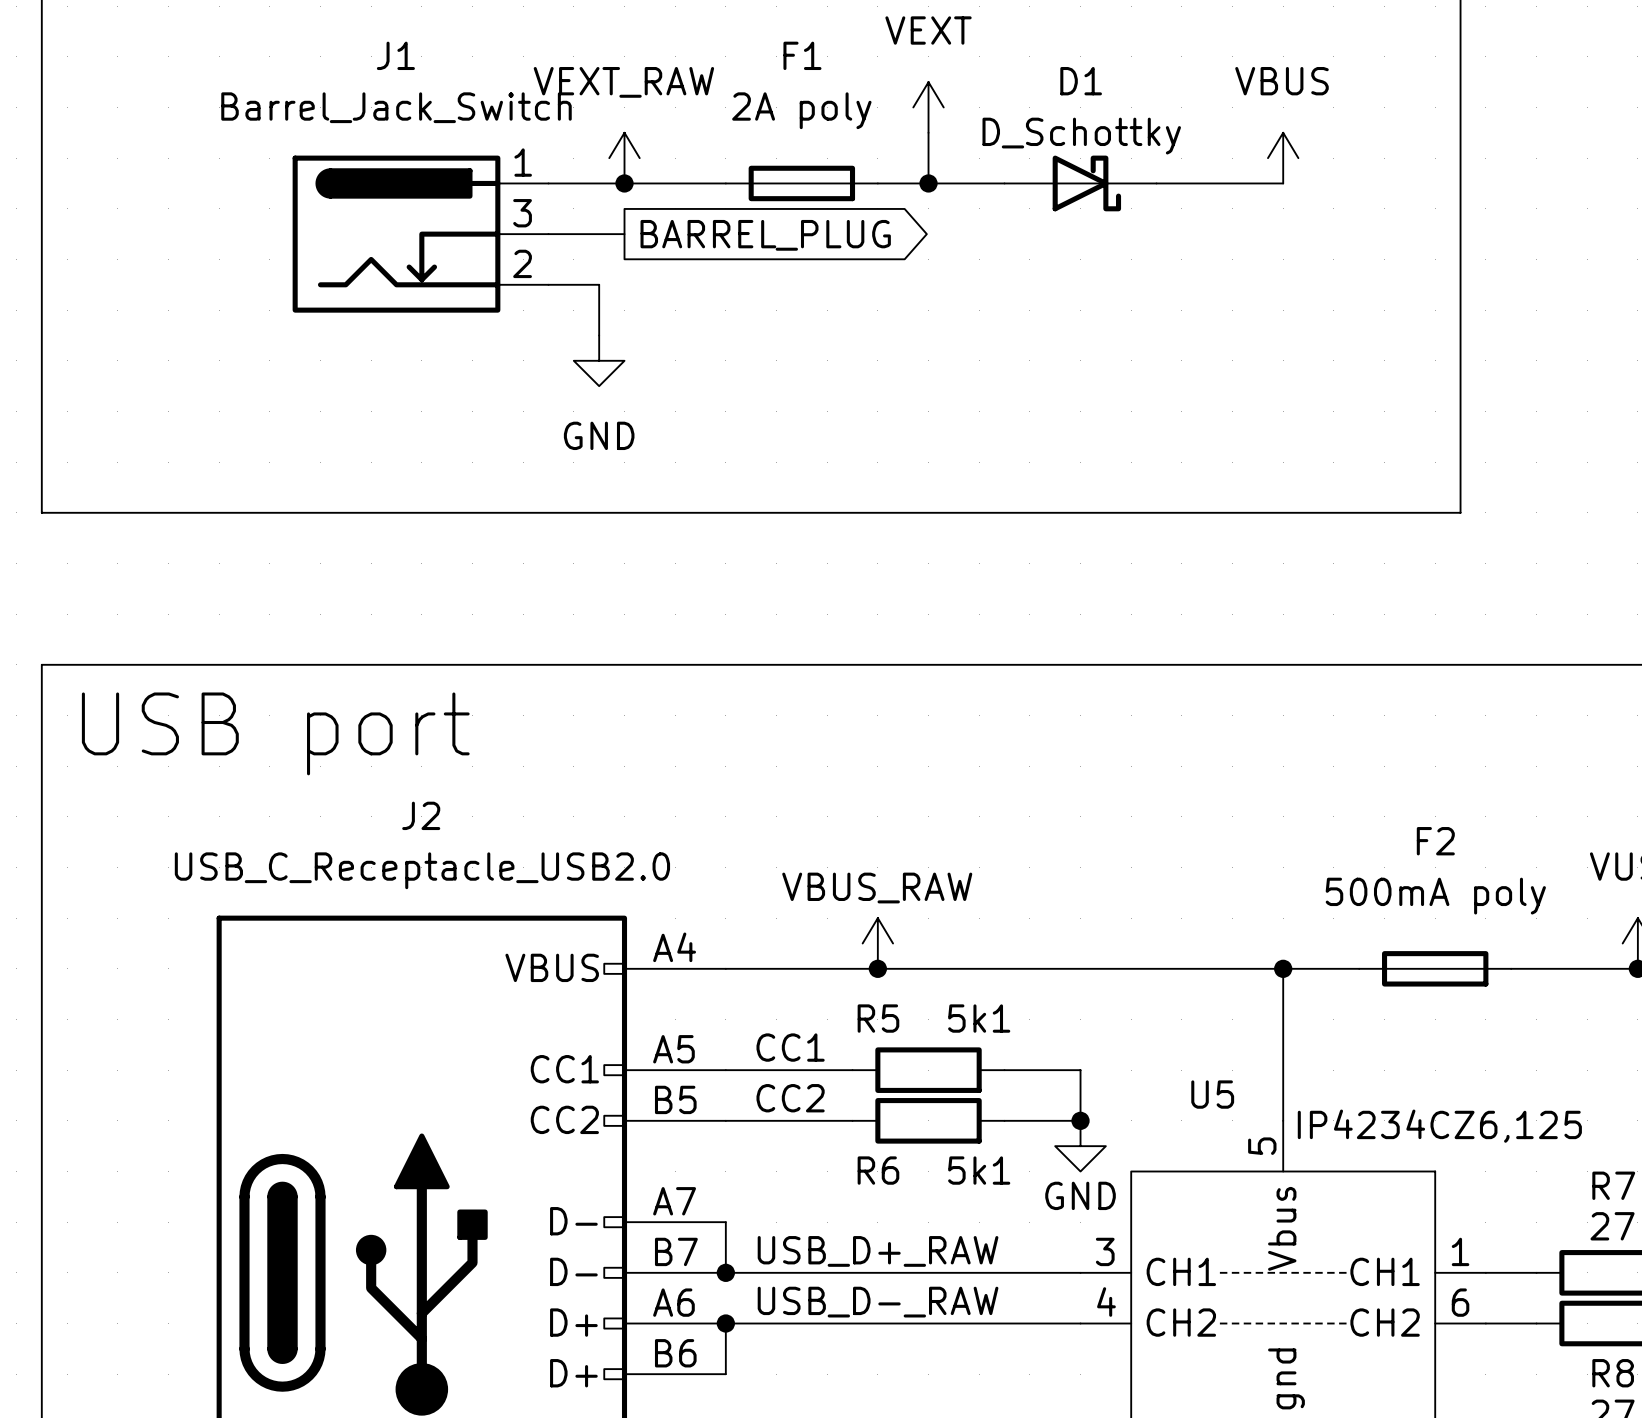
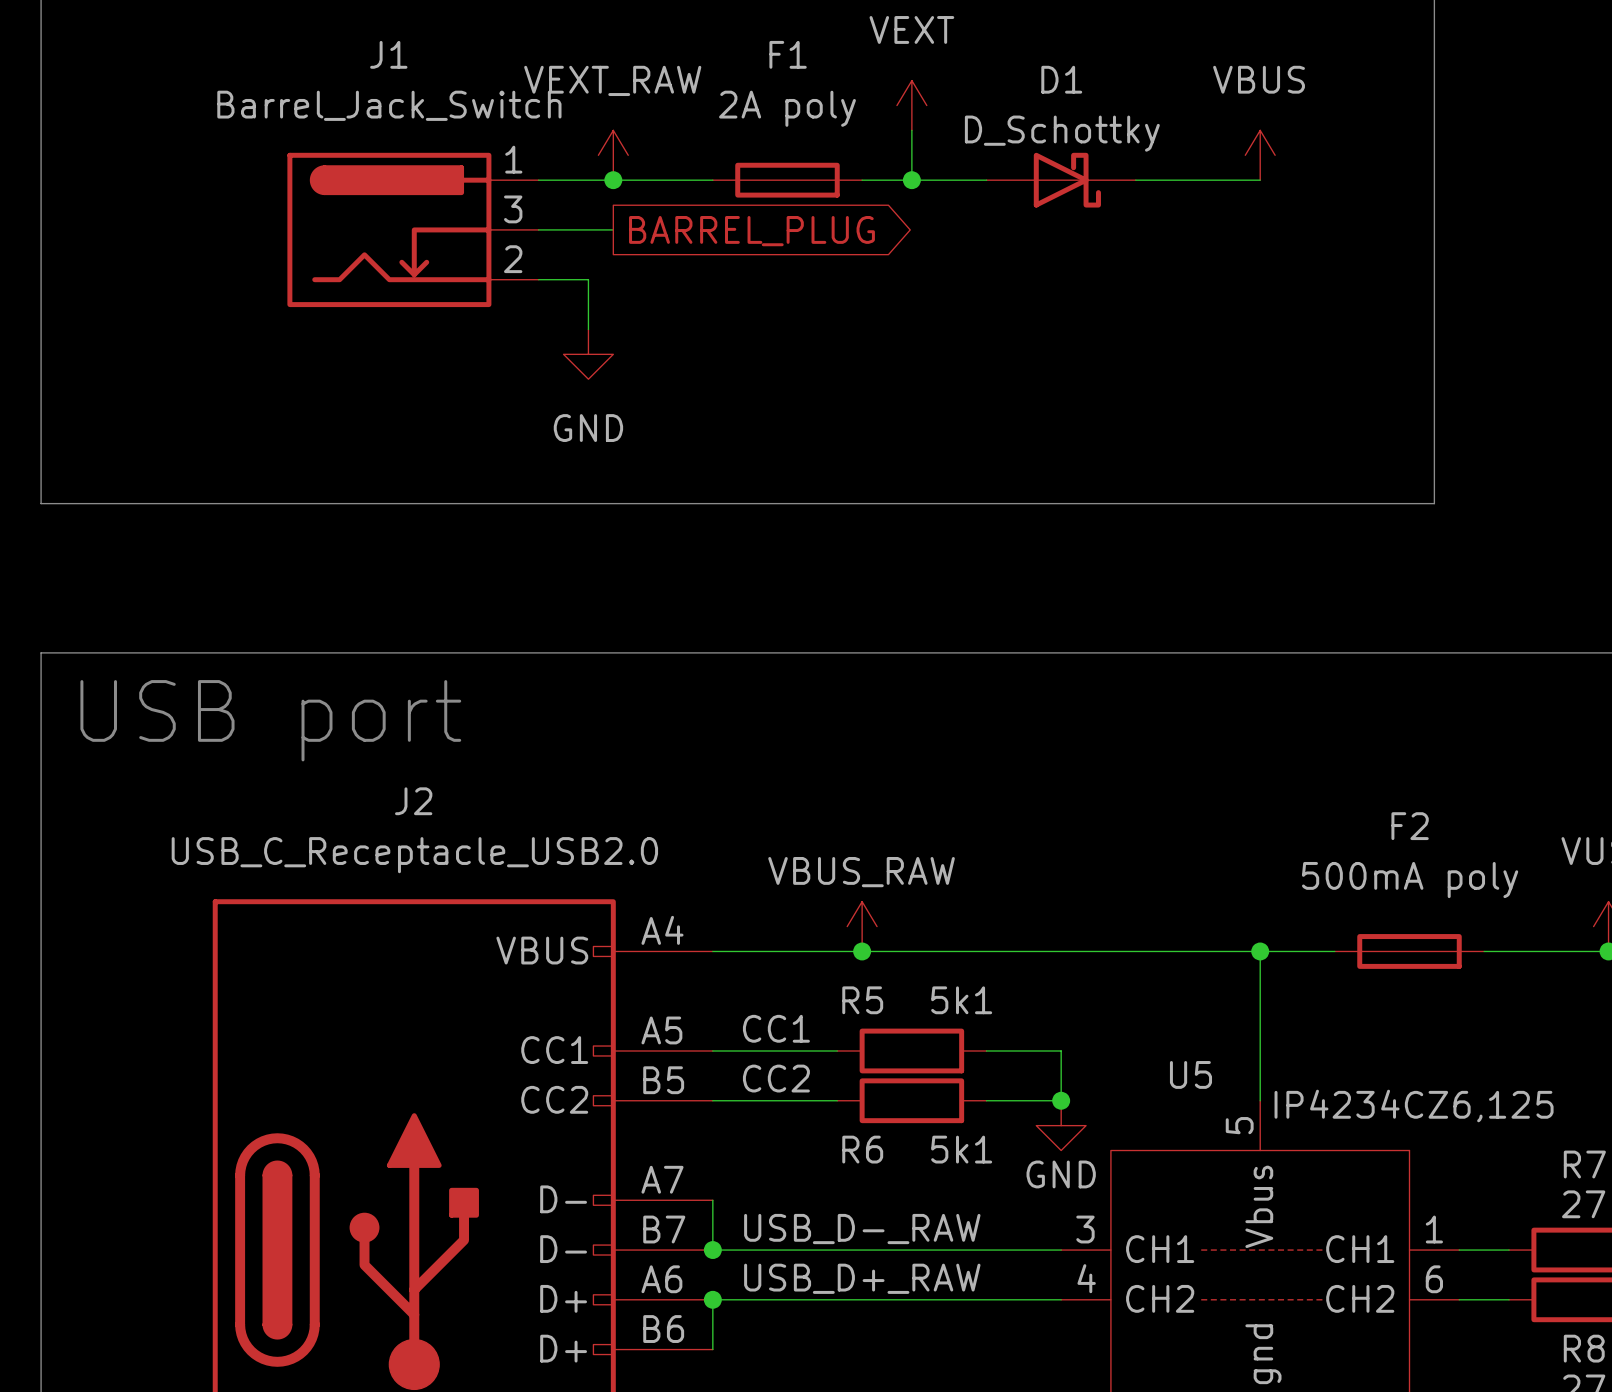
label: USB_D+_RAW (878, 1251) -> USB_D-_RAW (862, 1229)
label: USB_D-_RAW (878, 1302) -> USB_D+_RAW (862, 1278)

